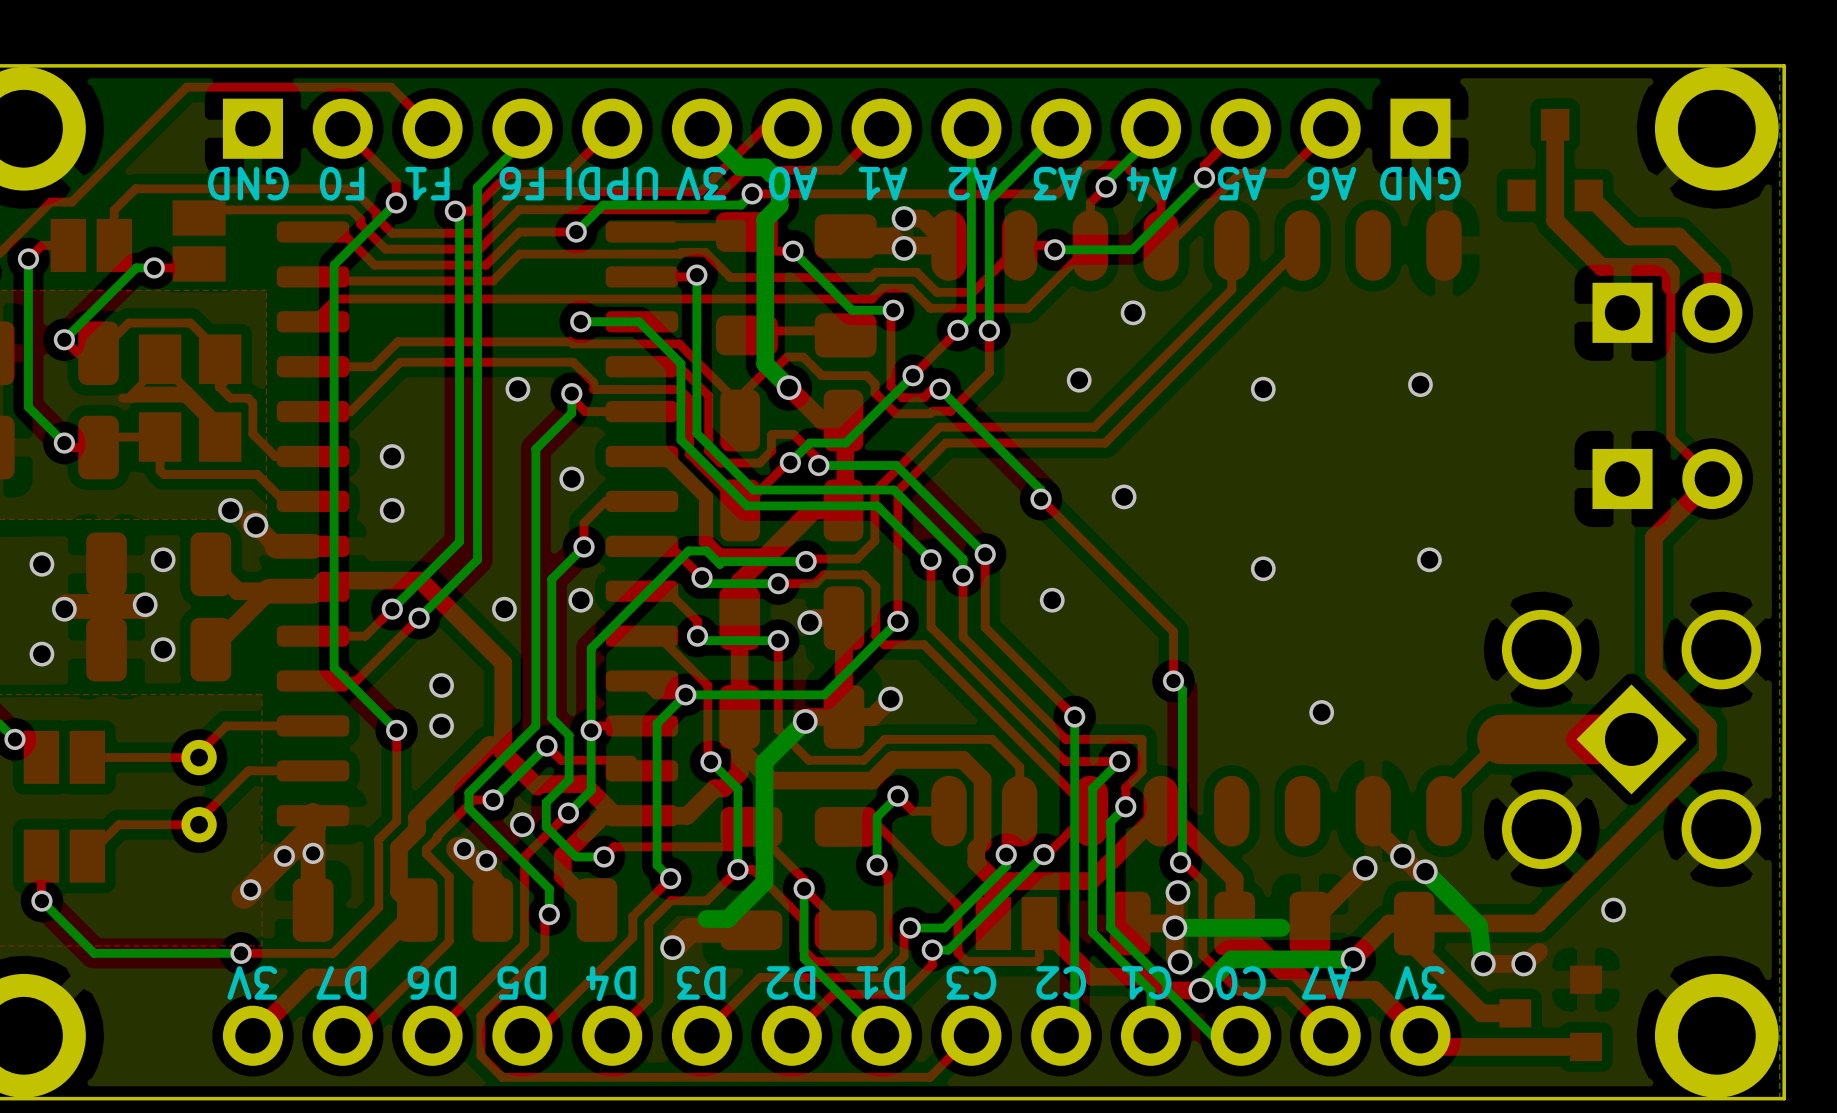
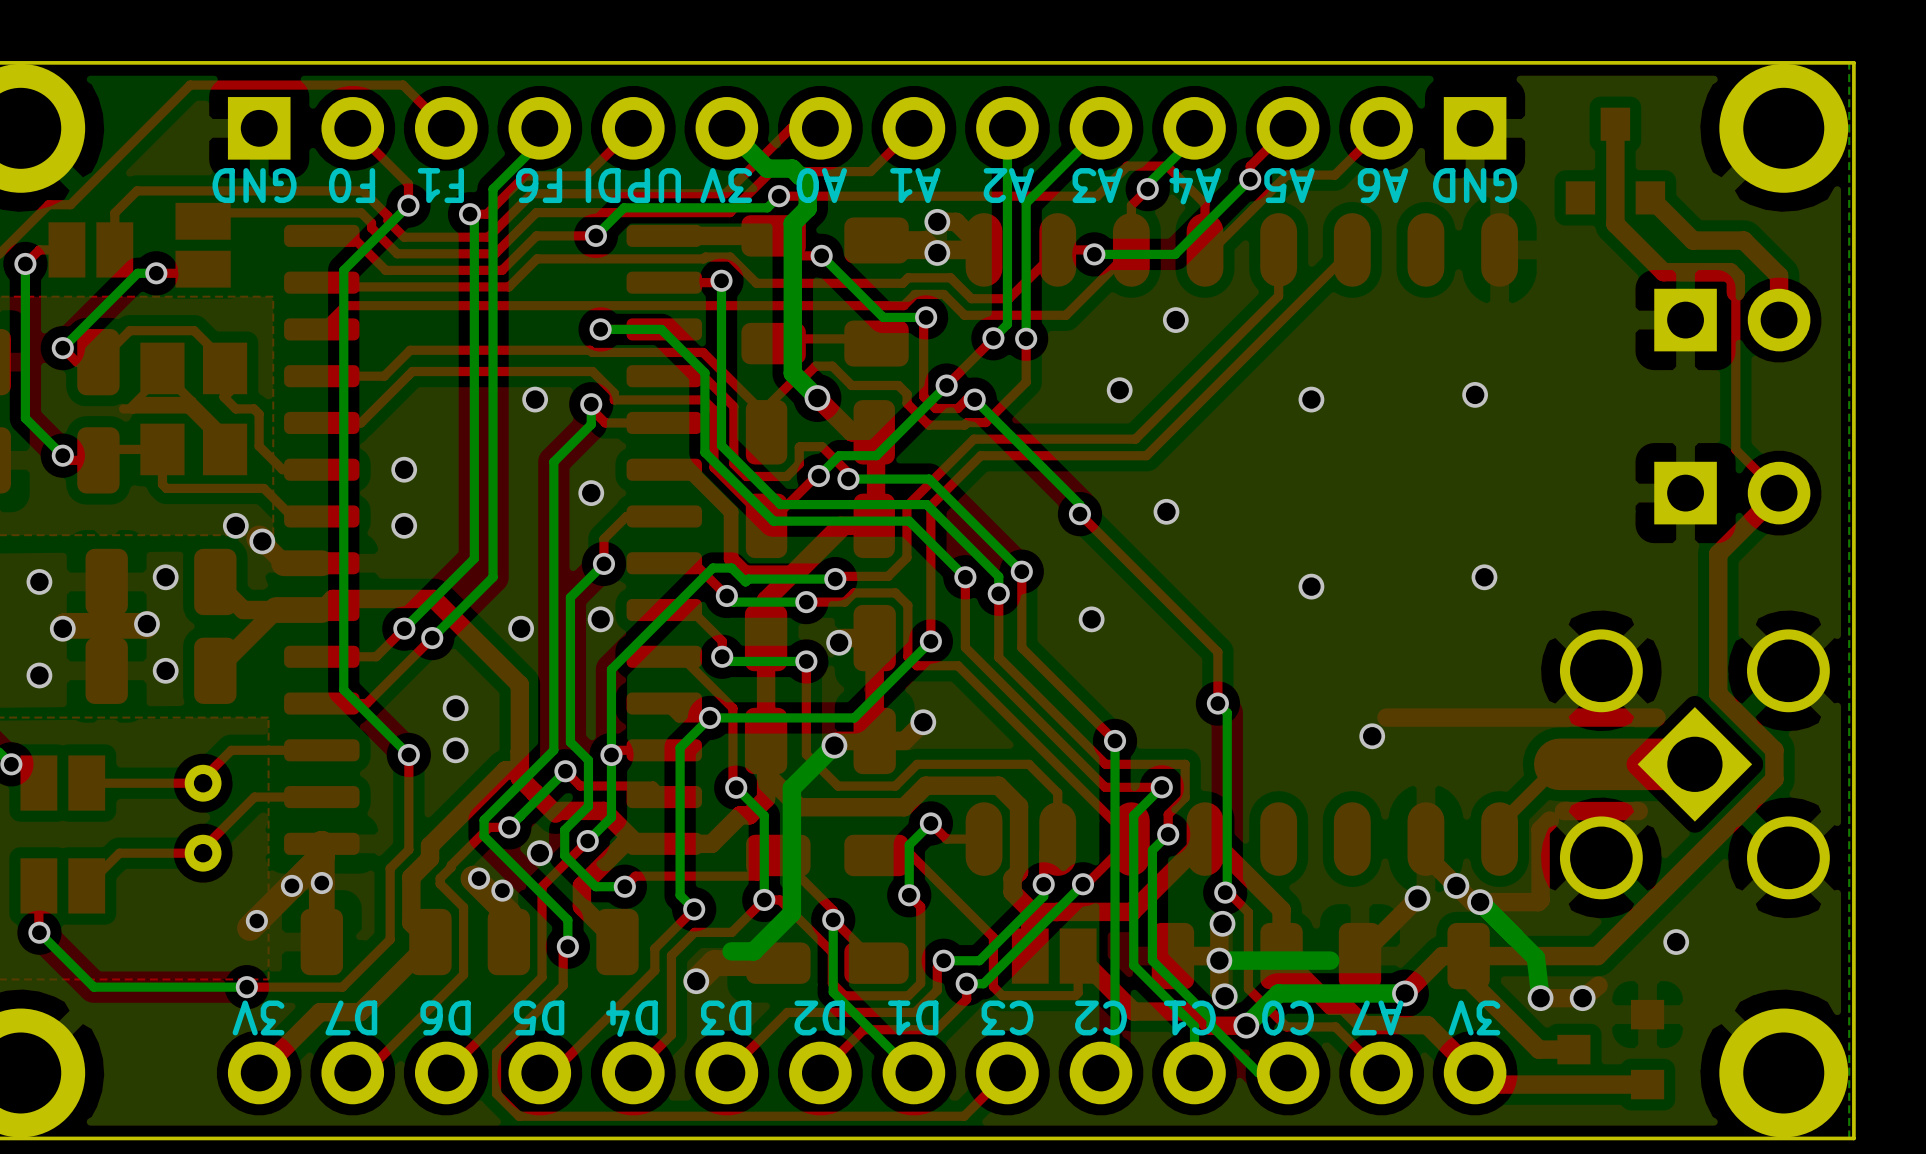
top track: none -> (1656, 717) (1386, 717)
top track: none -> (1638, 811) (1563, 811)
top track: none -> (1549, 820) (1540, 829) (1540, 899) (1538, 902) (1480, 902)

